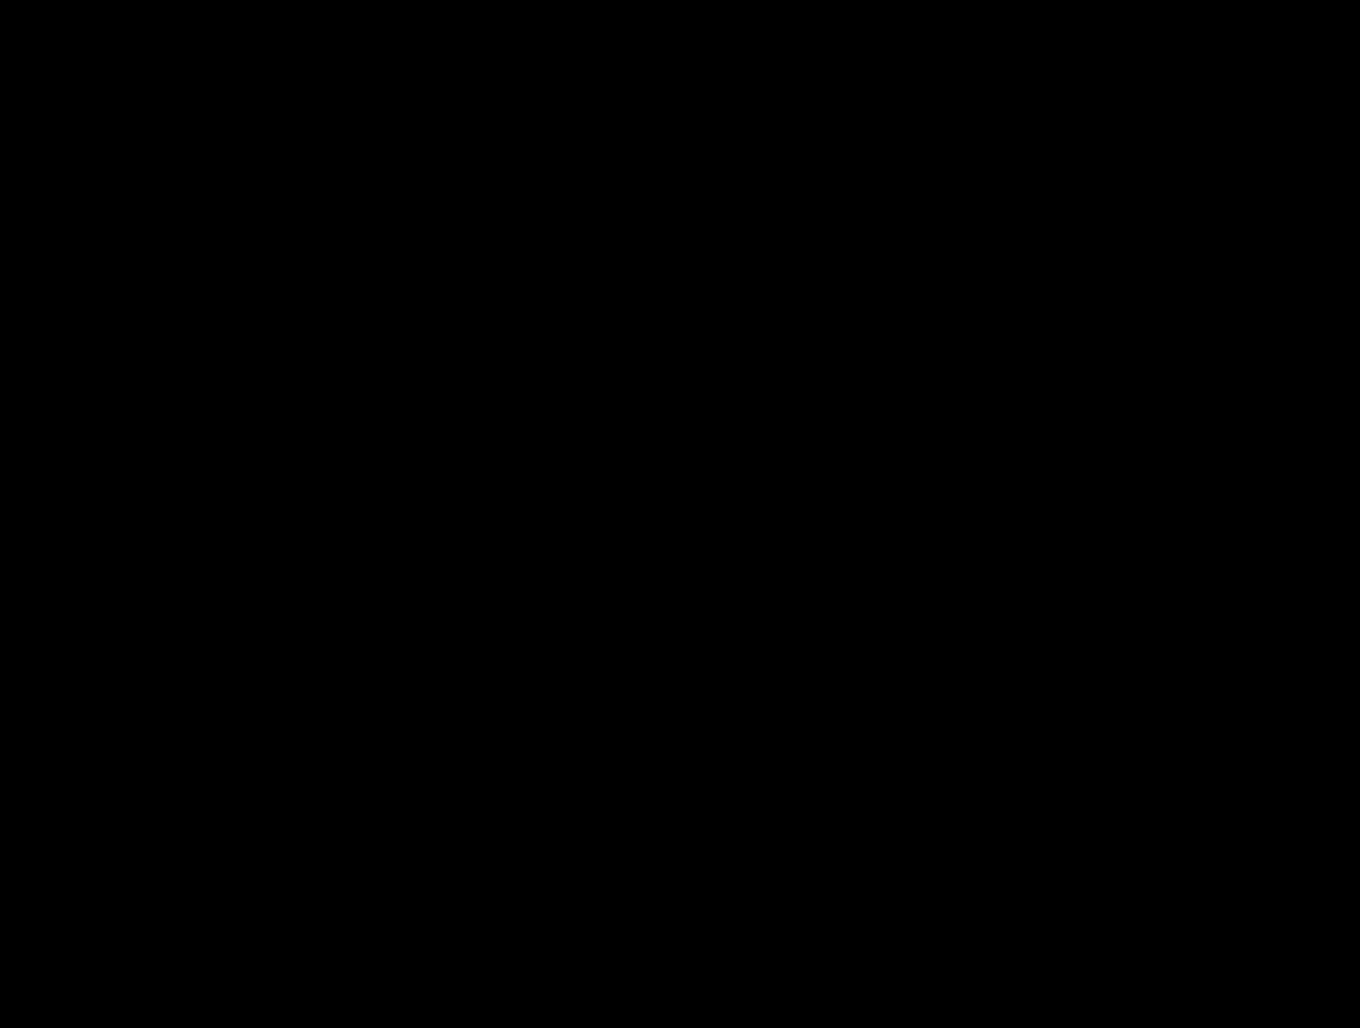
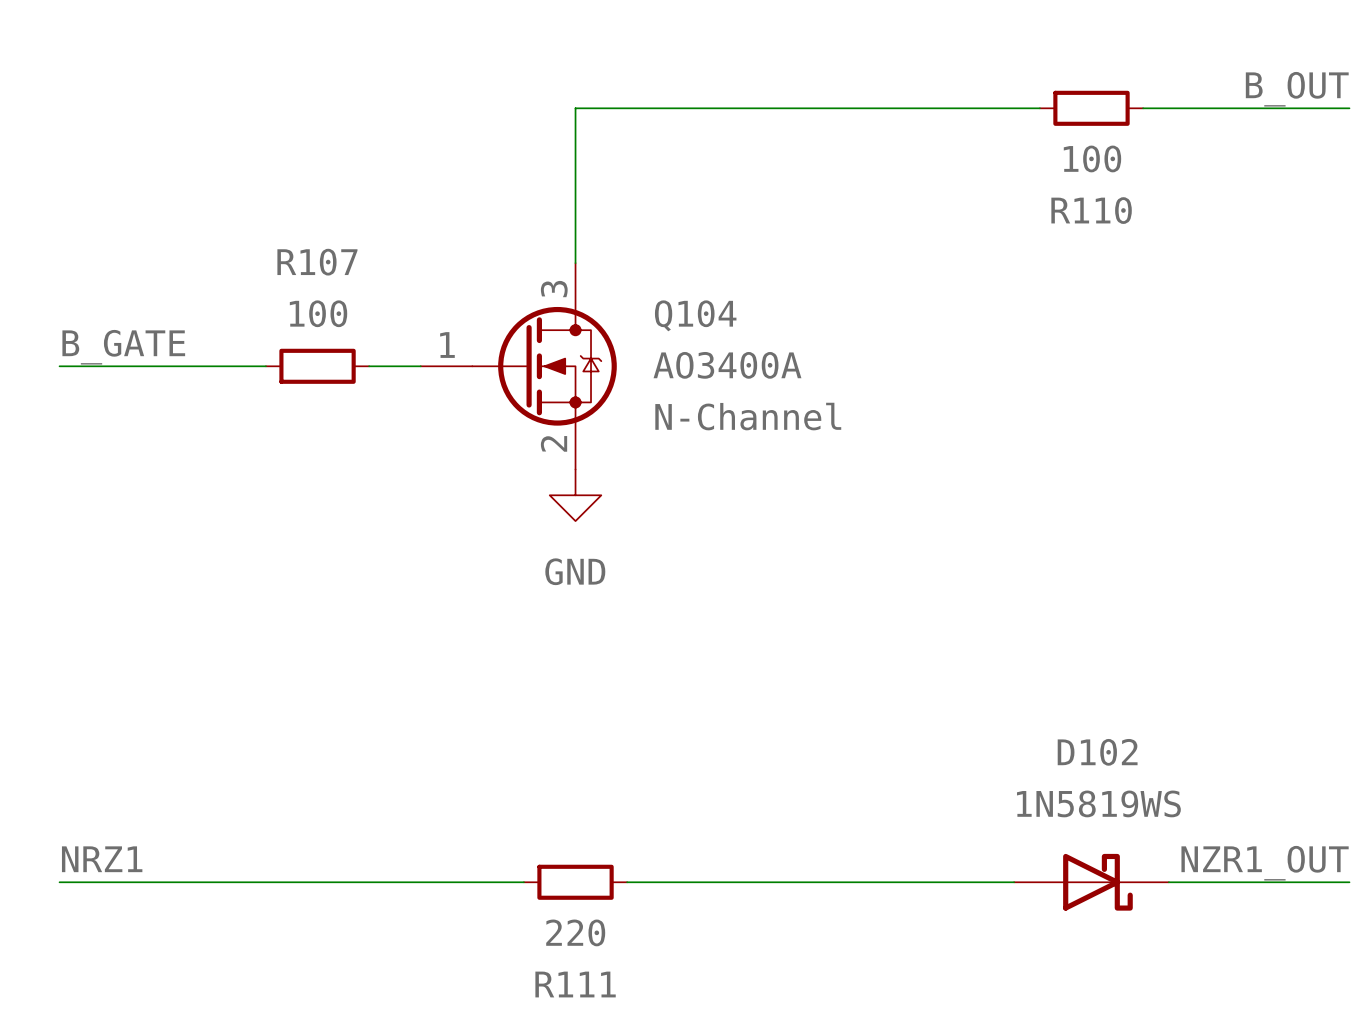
label: none -> B_OUT (1297, 89)
wire: none -> (1039, 108) (575, 108) (575, 263)
R110: none -> 100 (1091, 108)
wire: none -> (1143, 108) (1349, 108)
label: none -> B_GATE (123, 347)
wire: none -> (59, 366) (265, 366)
R107: none -> 100 (317, 366)
wire: none -> (369, 366) (420, 366)
Q104: none -> AO3400A (518, 366)
power symbol: none -> GND (575, 495)
label: none -> NRZ1 (102, 859)
label: none -> NZR1_OUT (1265, 863)
wire: none -> (59, 882) (523, 882)
R111: none -> 220 (575, 882)
wire: none -> (627, 882) (1014, 882)
D102: none -> 1N5819WS (1091, 882)
wire: none -> (1168, 882) (1349, 882)

